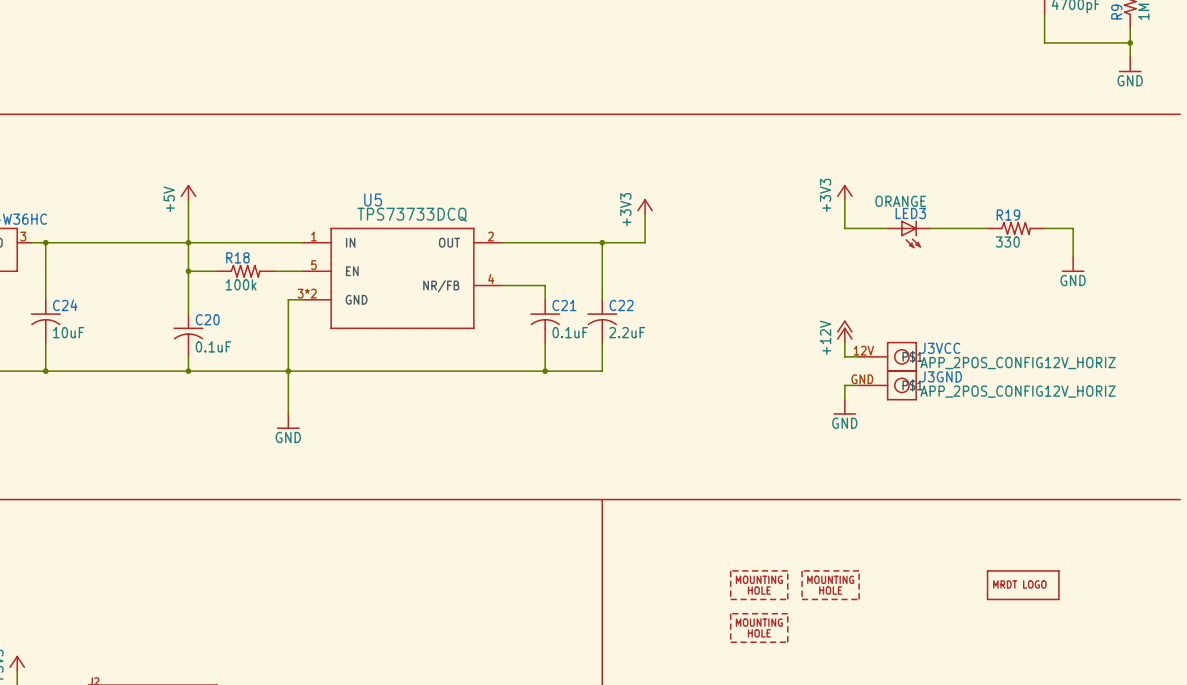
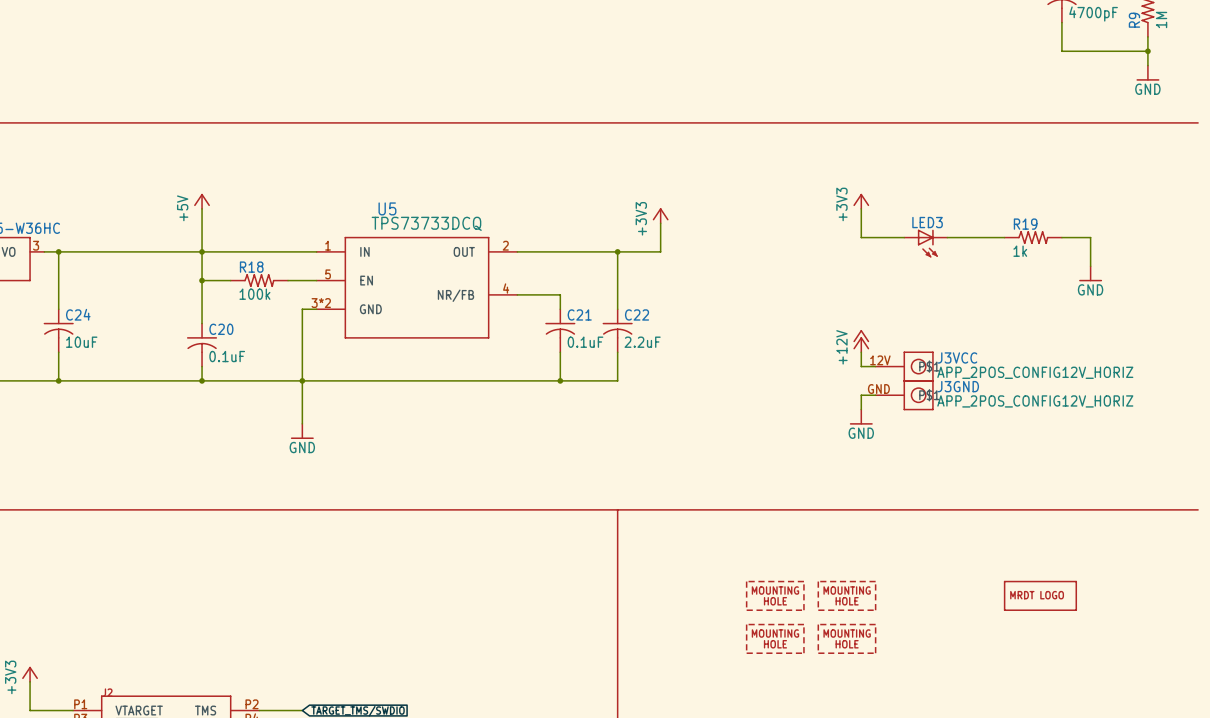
LED3 value: ORANGE (900, 201) -> none
R19 value: 330 (1007, 242) -> 1k (1020, 251)
part: none -> (846, 638)

